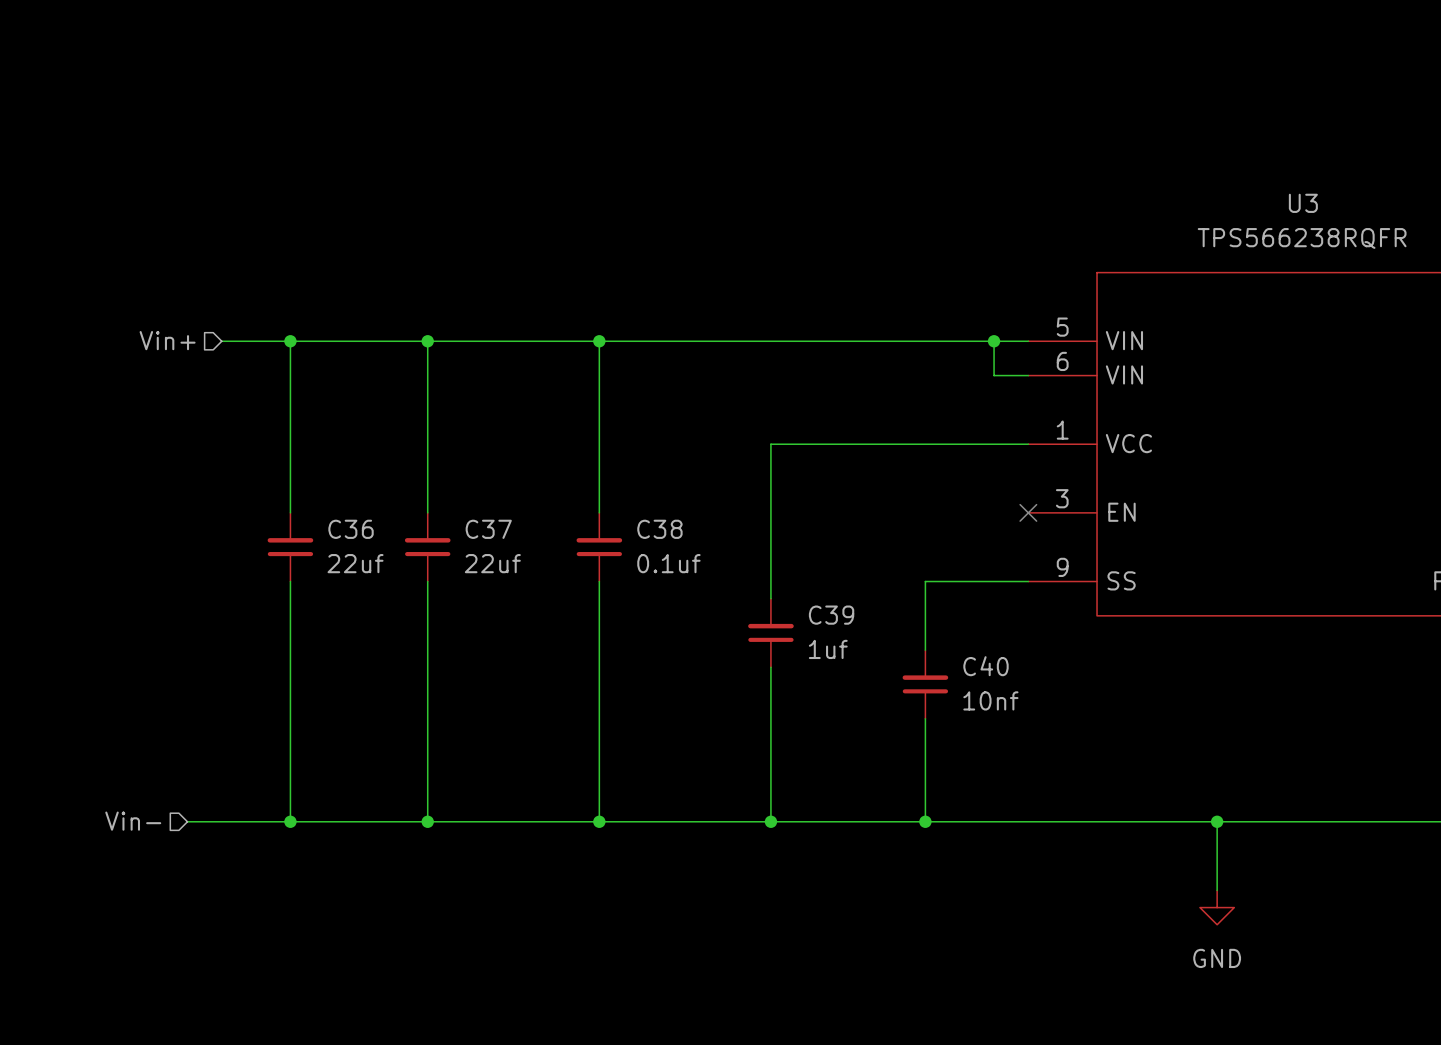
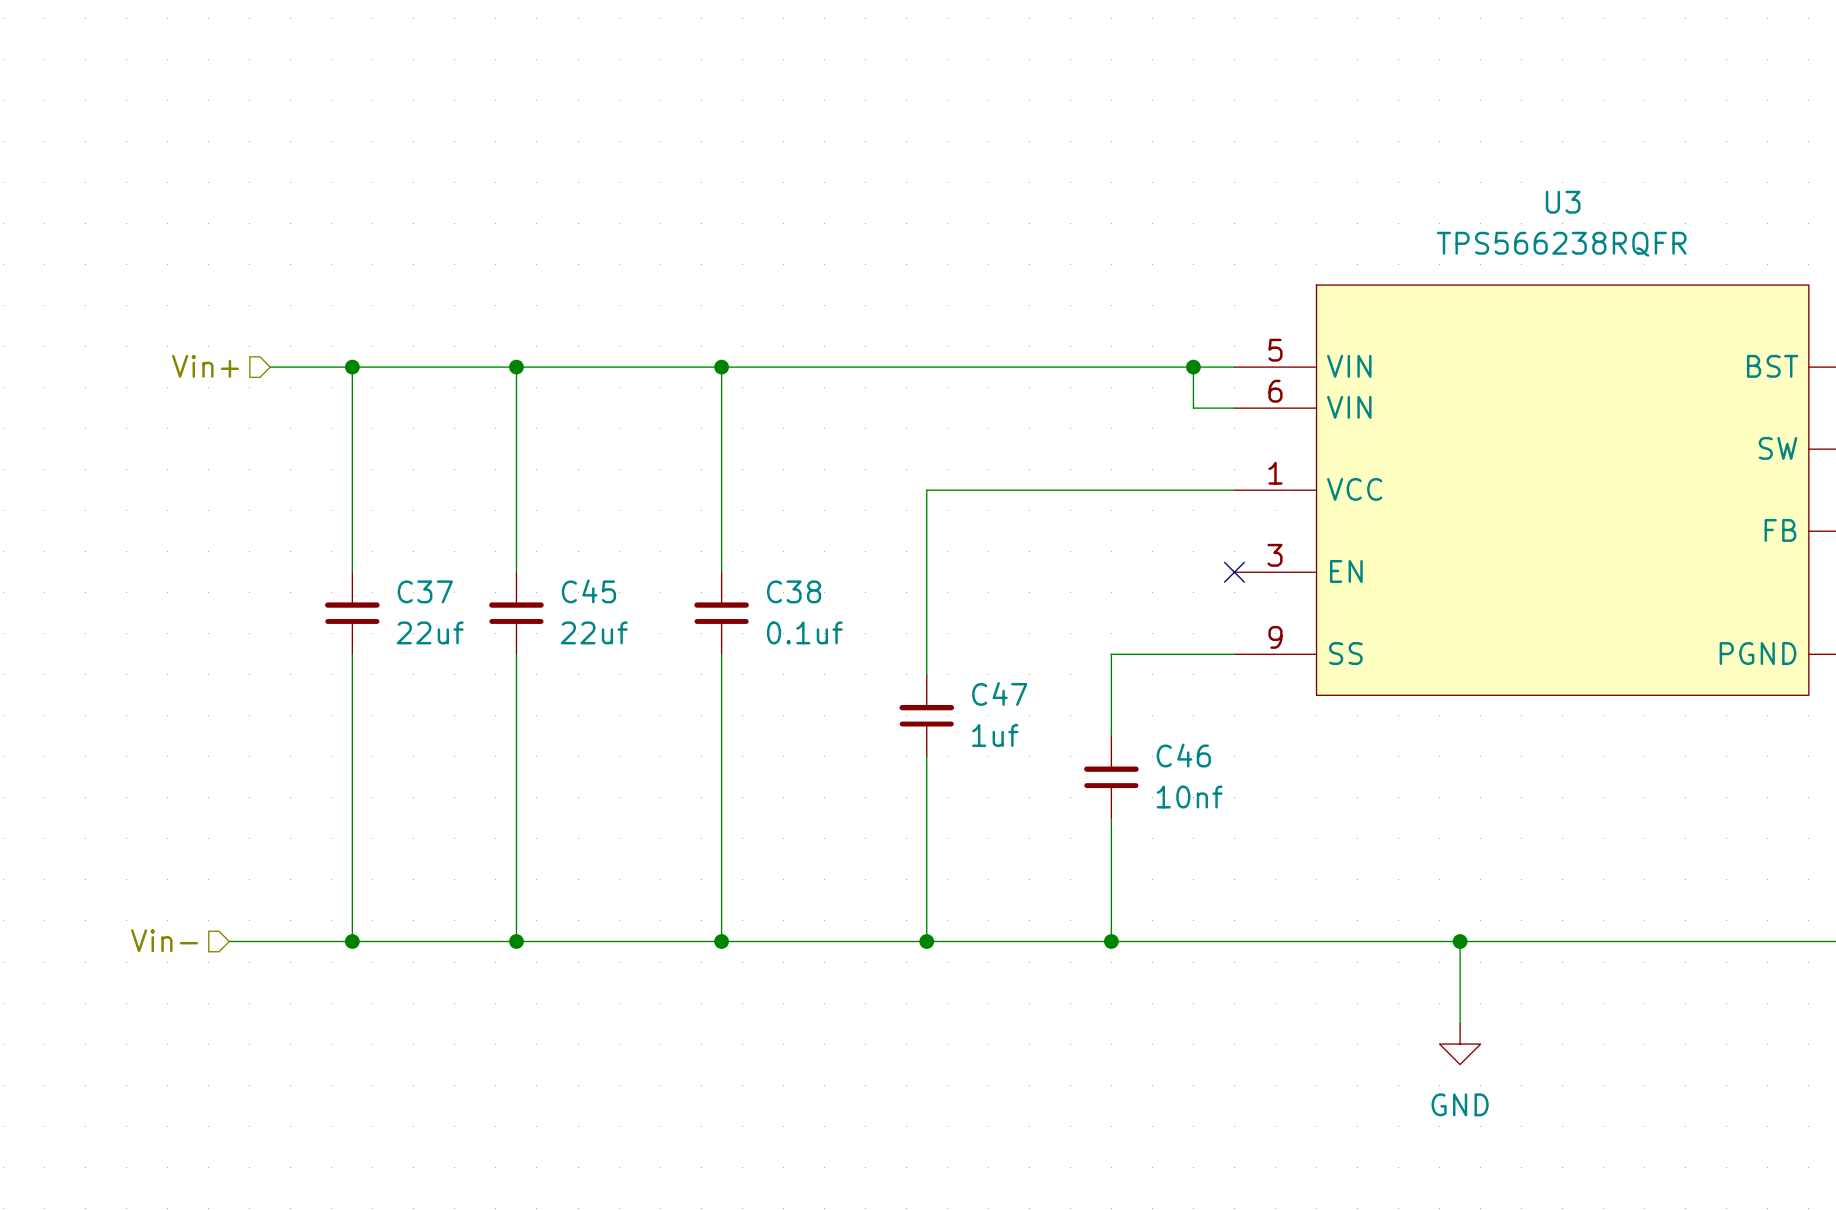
C36 name: C36 (351, 529) -> C37 (425, 591)
C37 name: C37 (488, 529) -> C45 (588, 591)
C39 name: C39 (831, 615) -> C47 (999, 693)
C40 name: C40 (986, 666) -> C46 (1183, 755)

